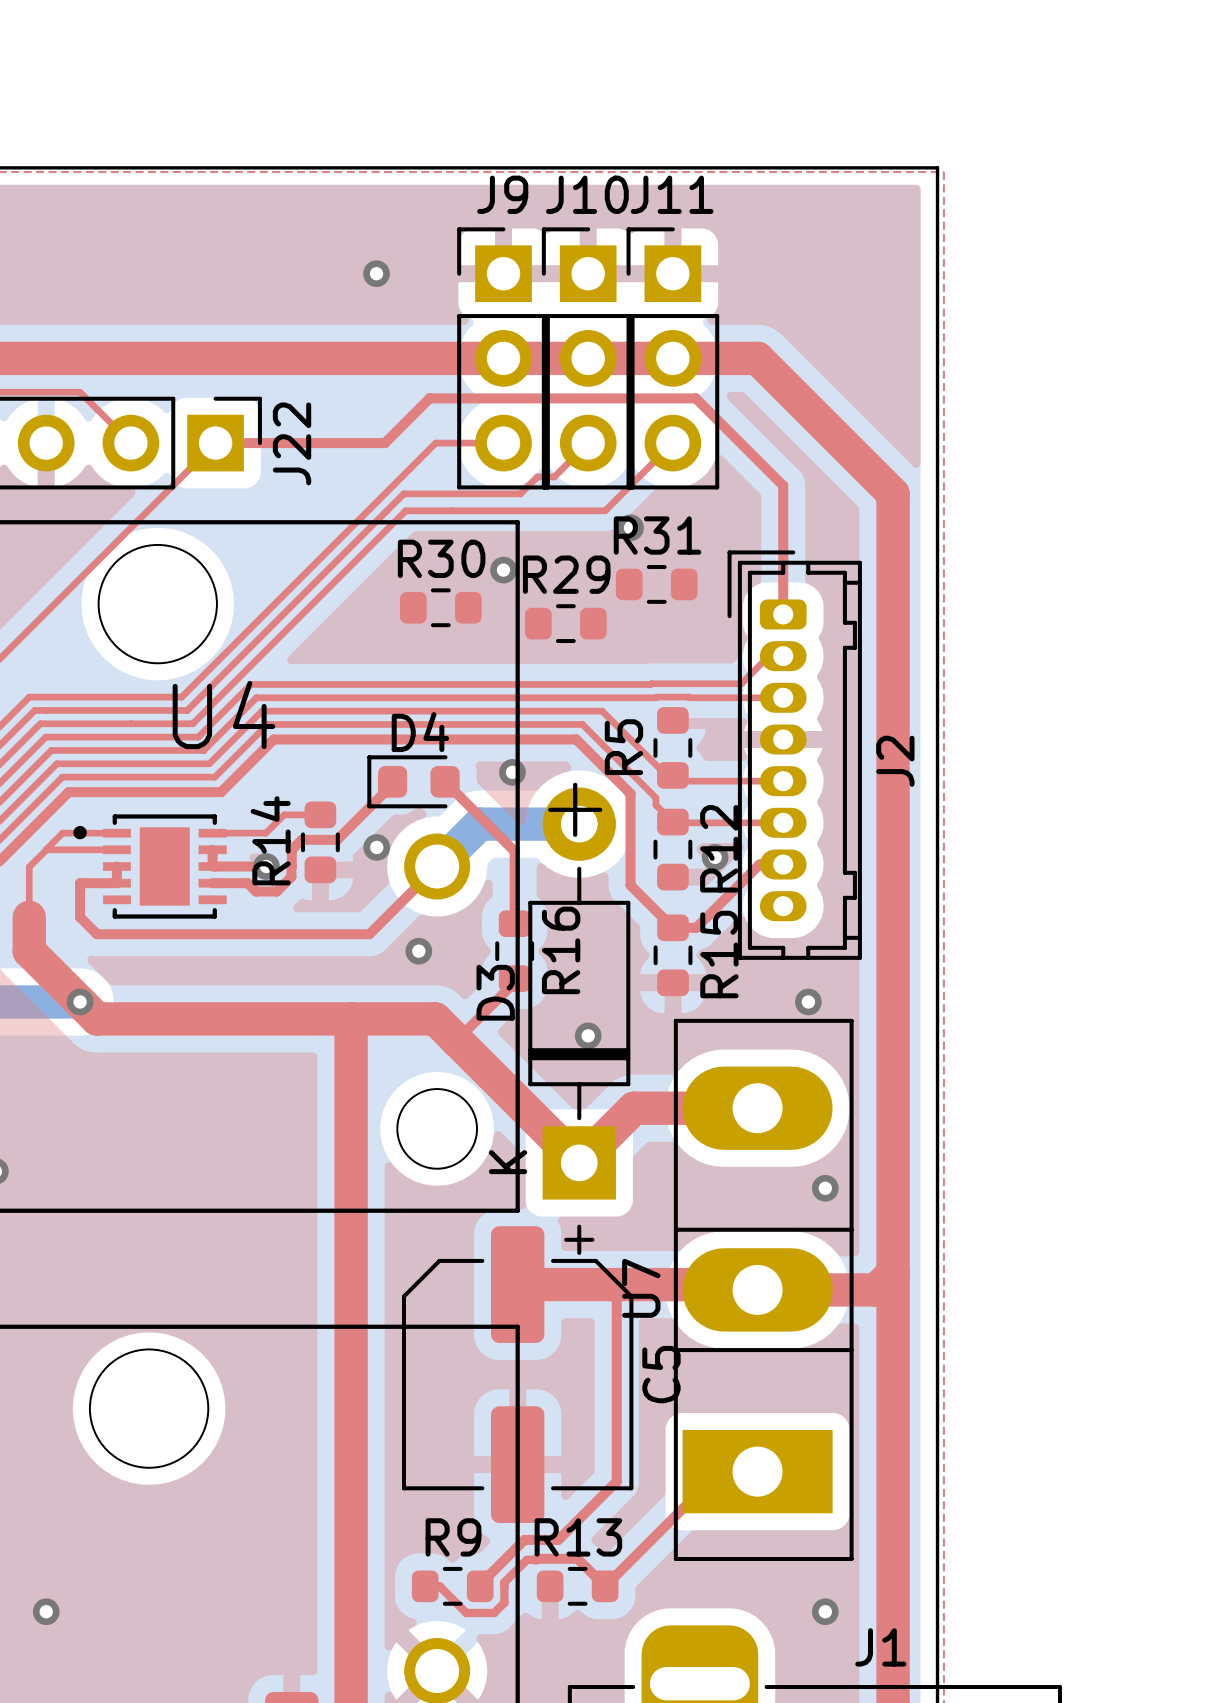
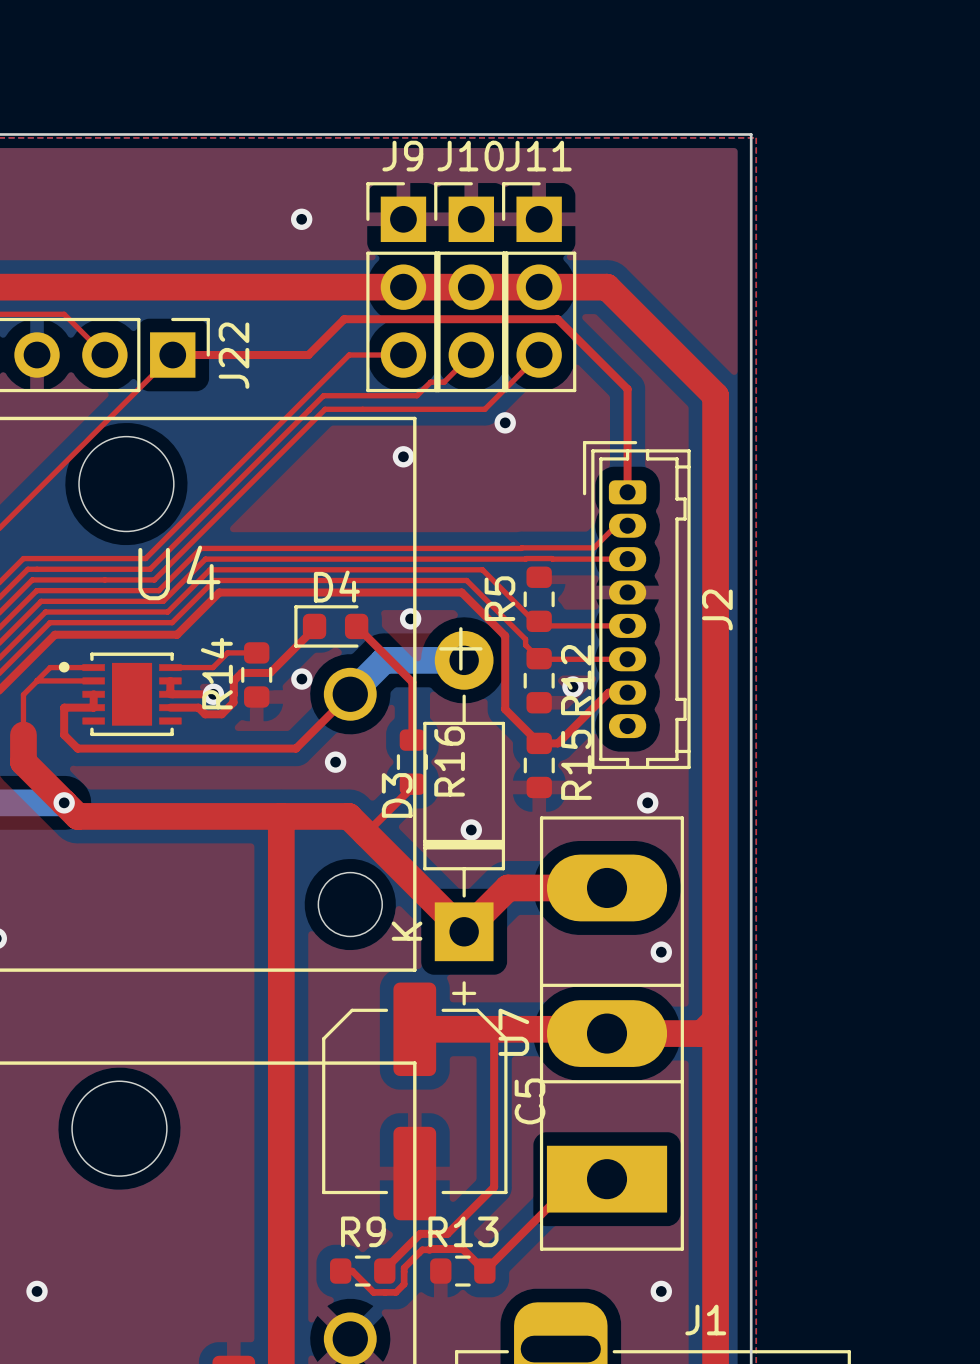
R31: (656, 584) -> none
R30: (440, 607) -> none
R29: (565, 623) -> none

